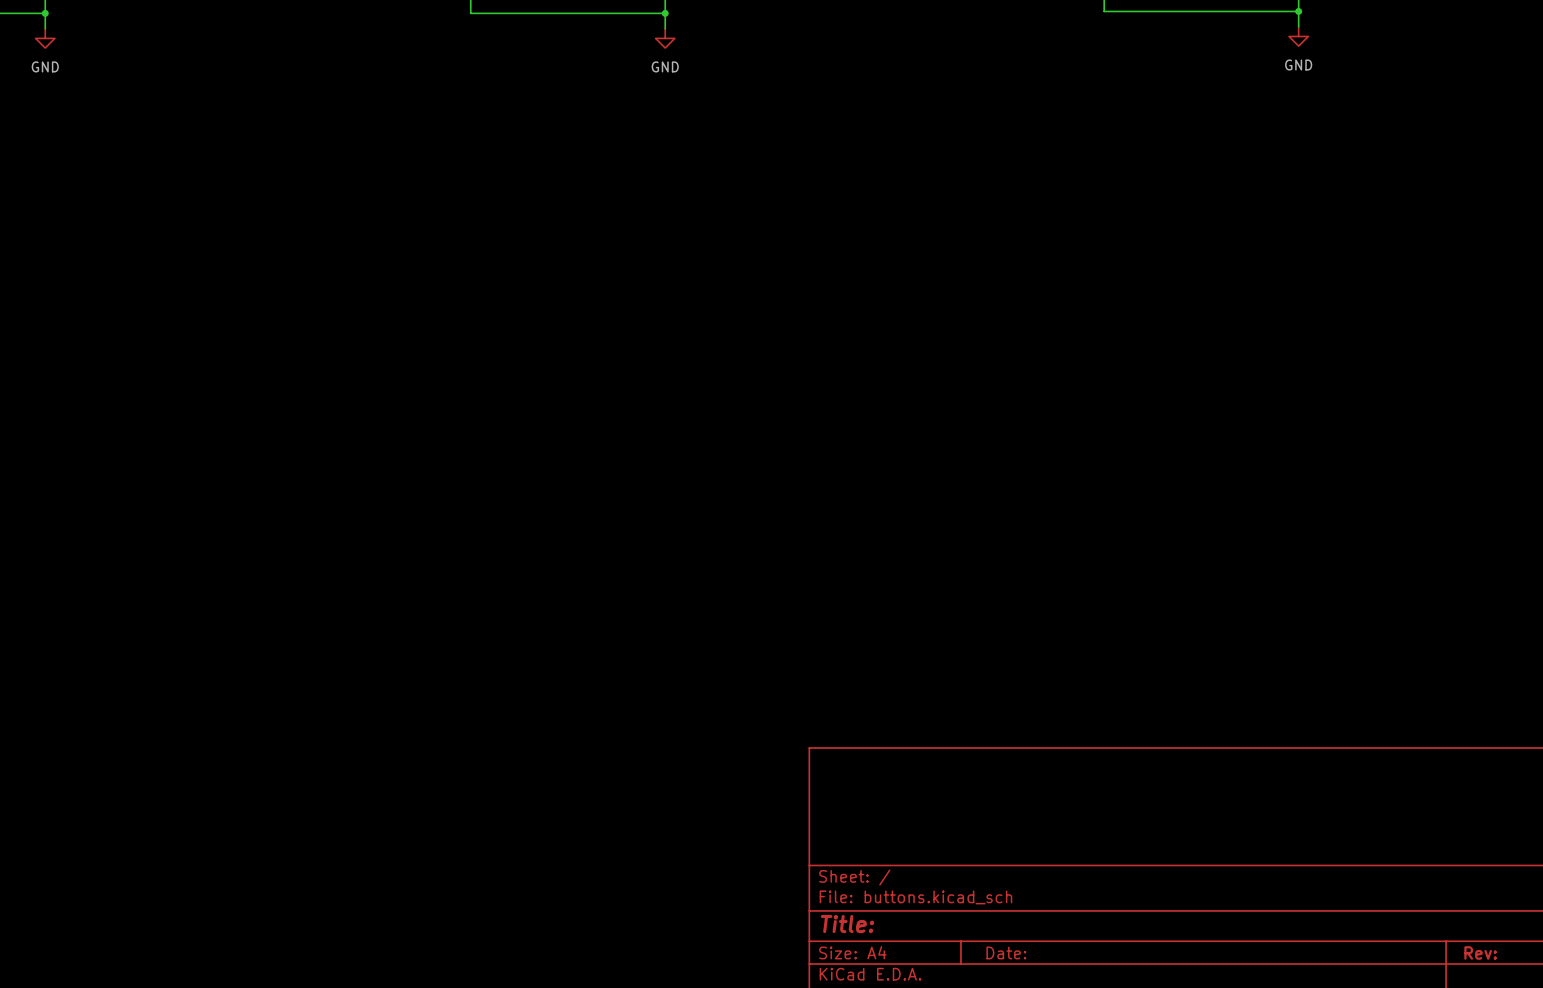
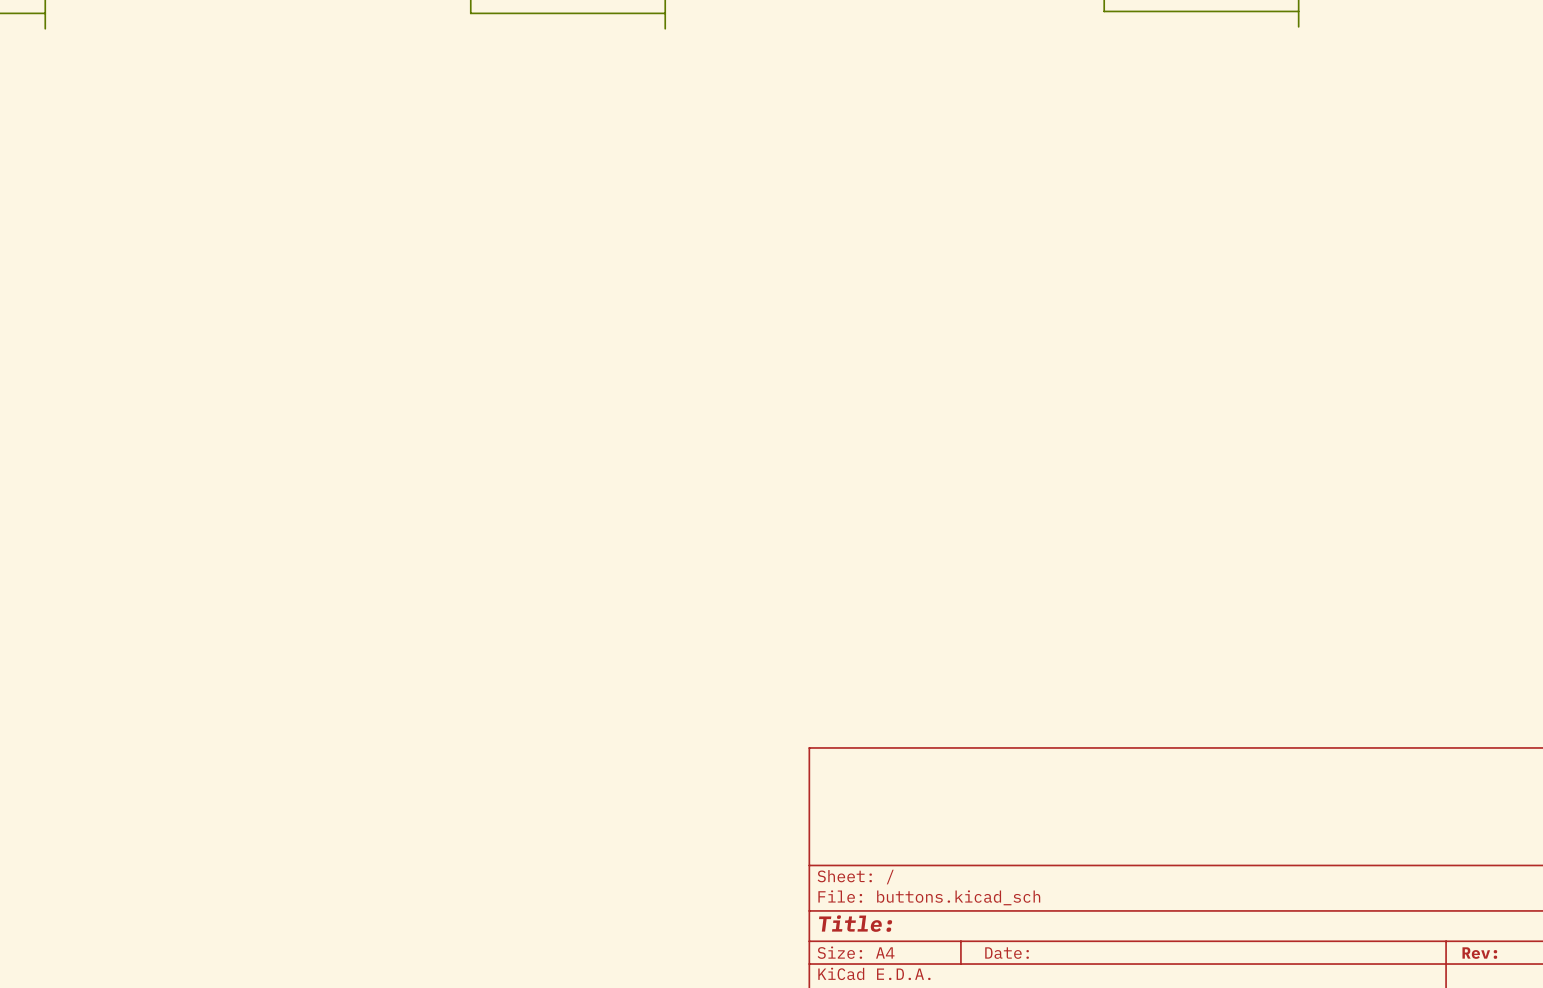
junction: (1298, 11) -> none
junction: (45, 13) -> none
junction: (665, 13) -> none
power symbol: GND (1298, 36) -> none
power symbol: GND (45, 38) -> none
power symbol: GND (665, 38) -> none

